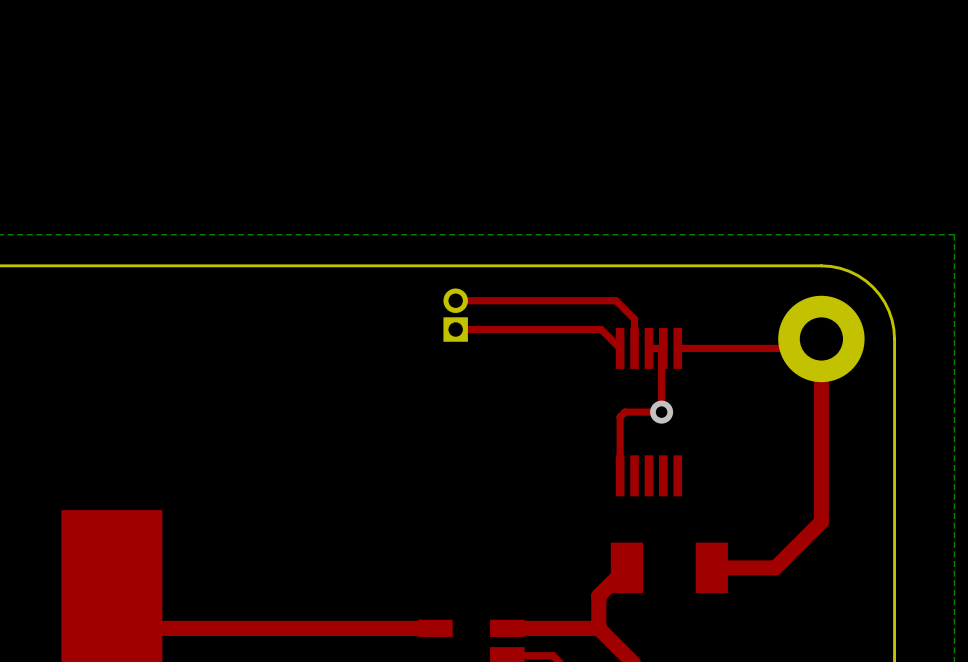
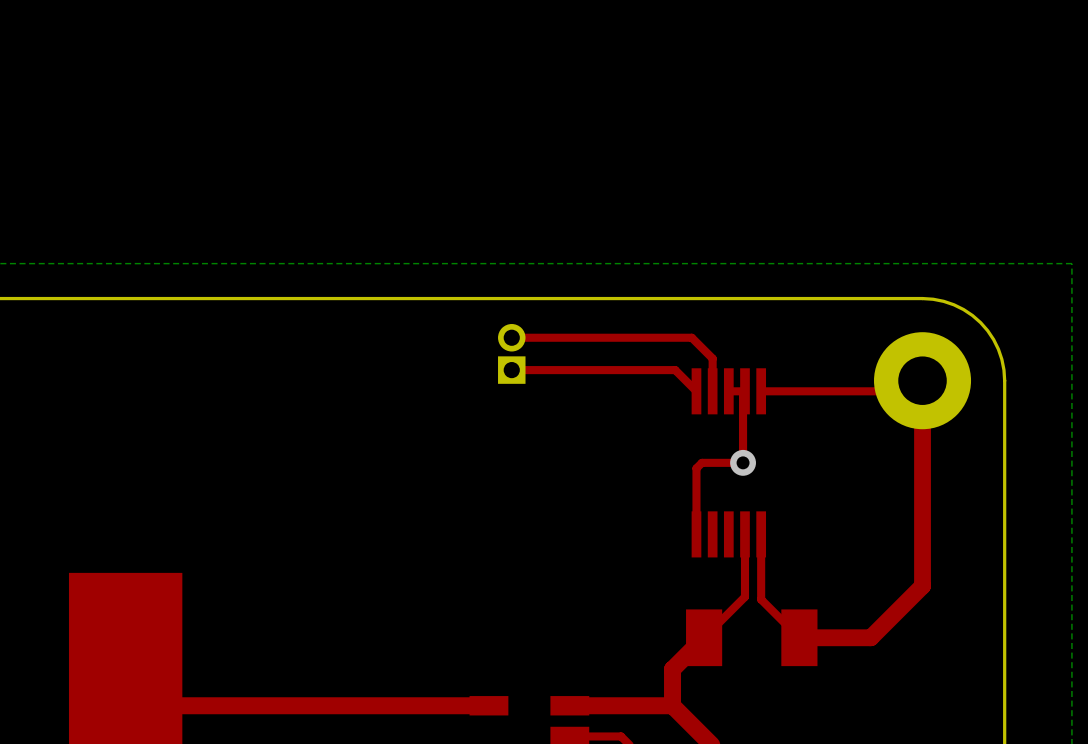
top track: none -> (744, 534) (744, 596) (704, 637)
top track: none -> (761, 534) (761, 599) (799, 637)

